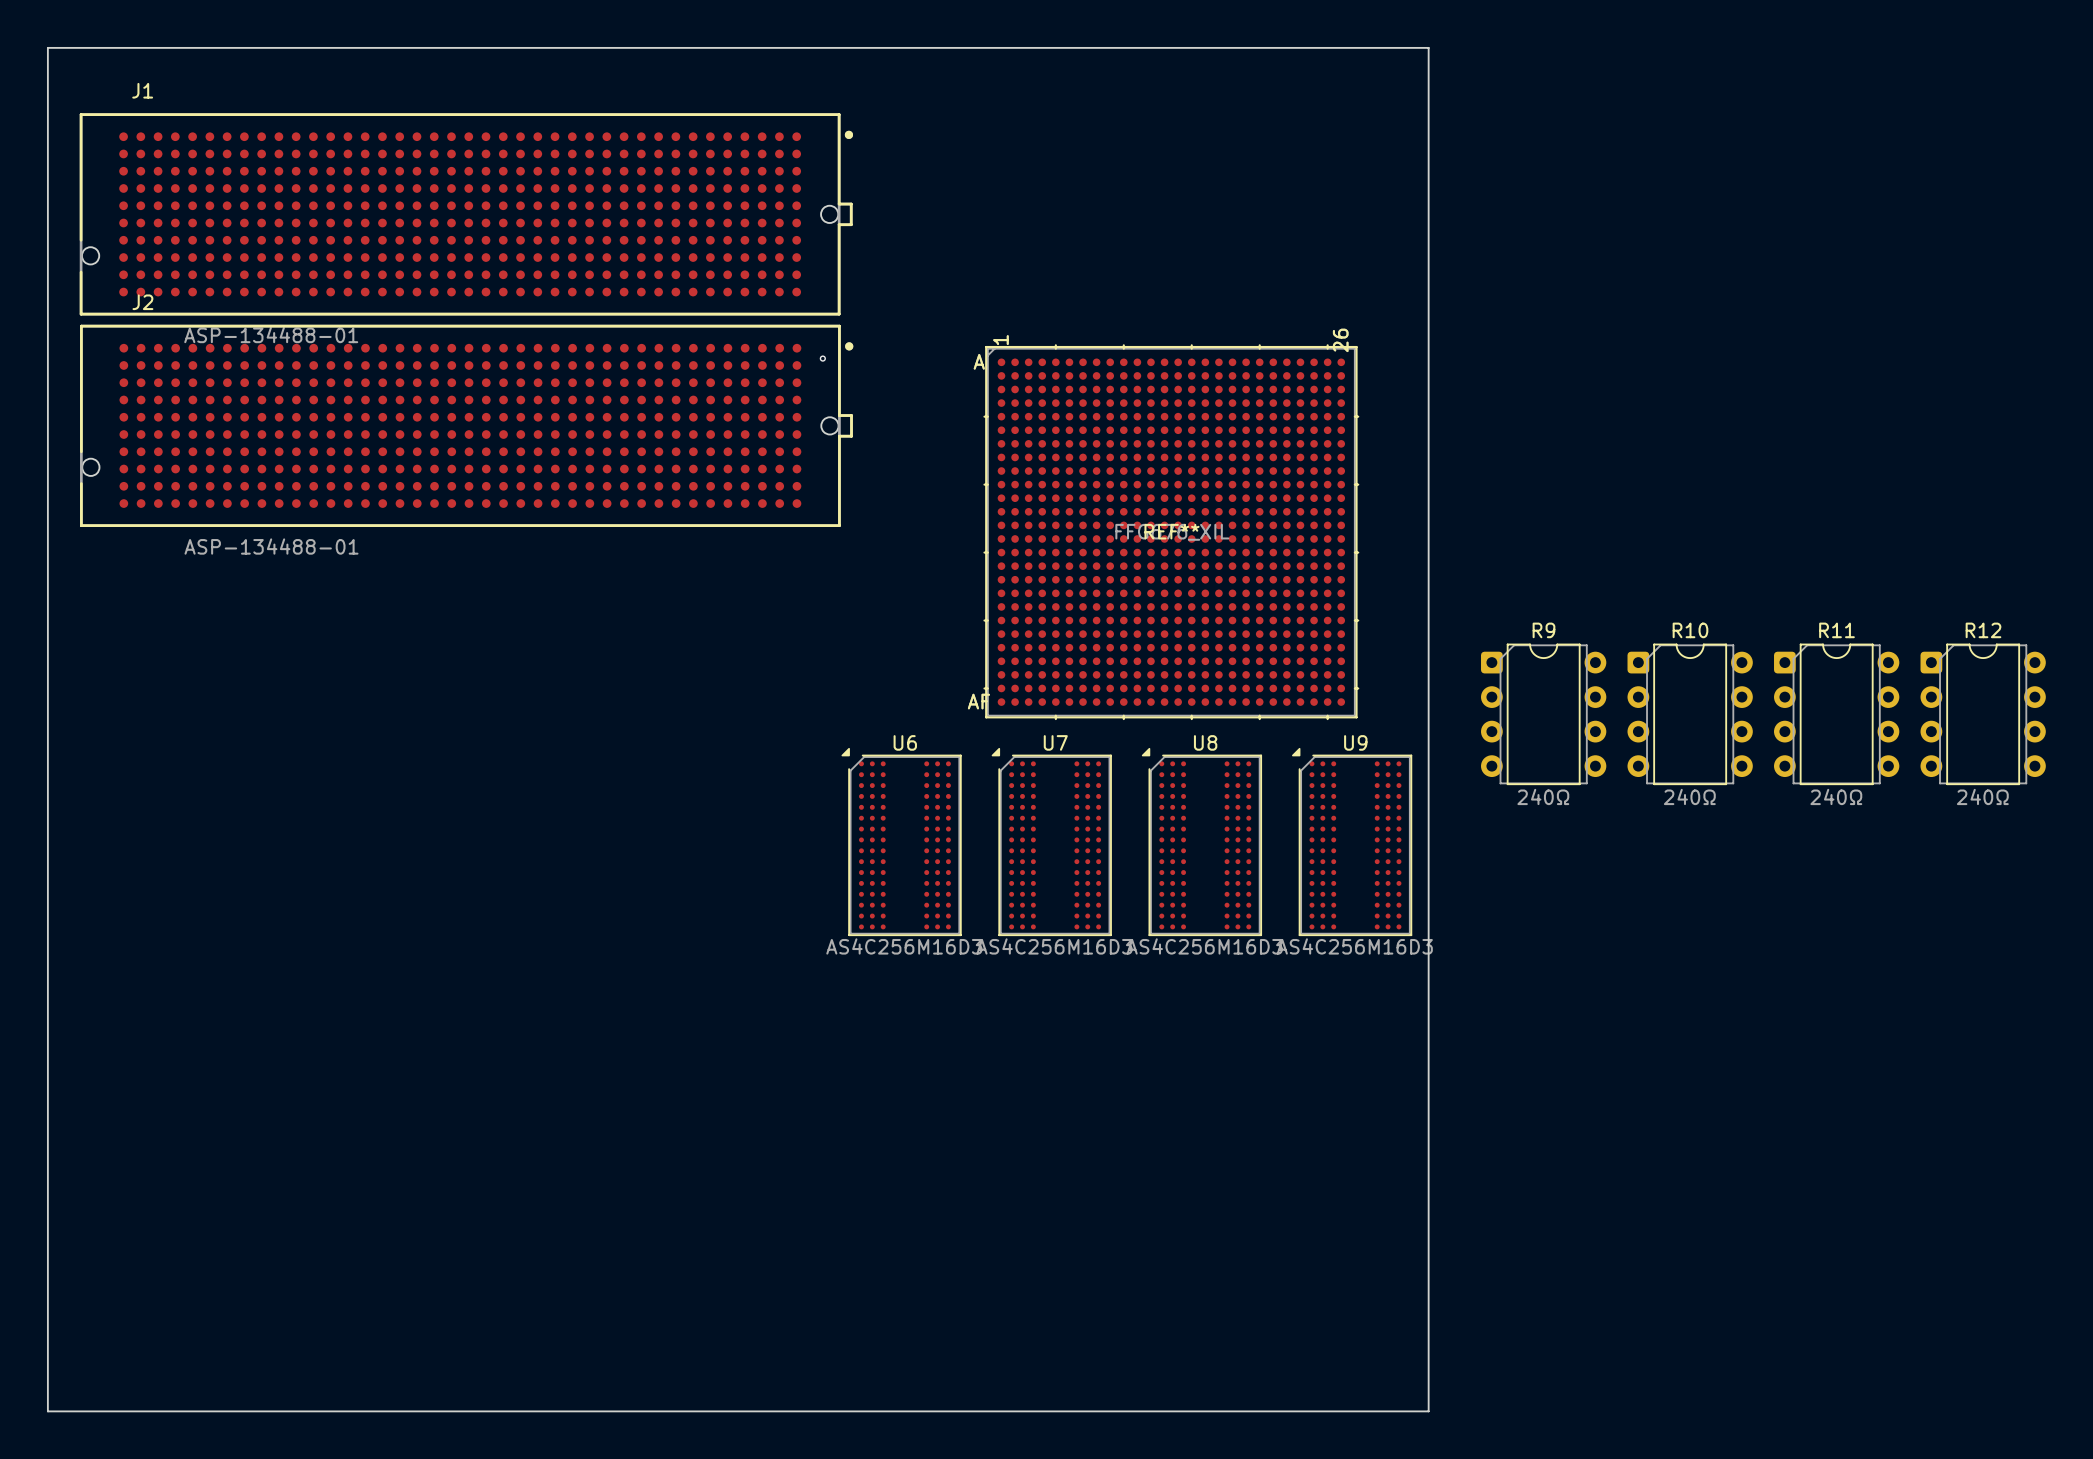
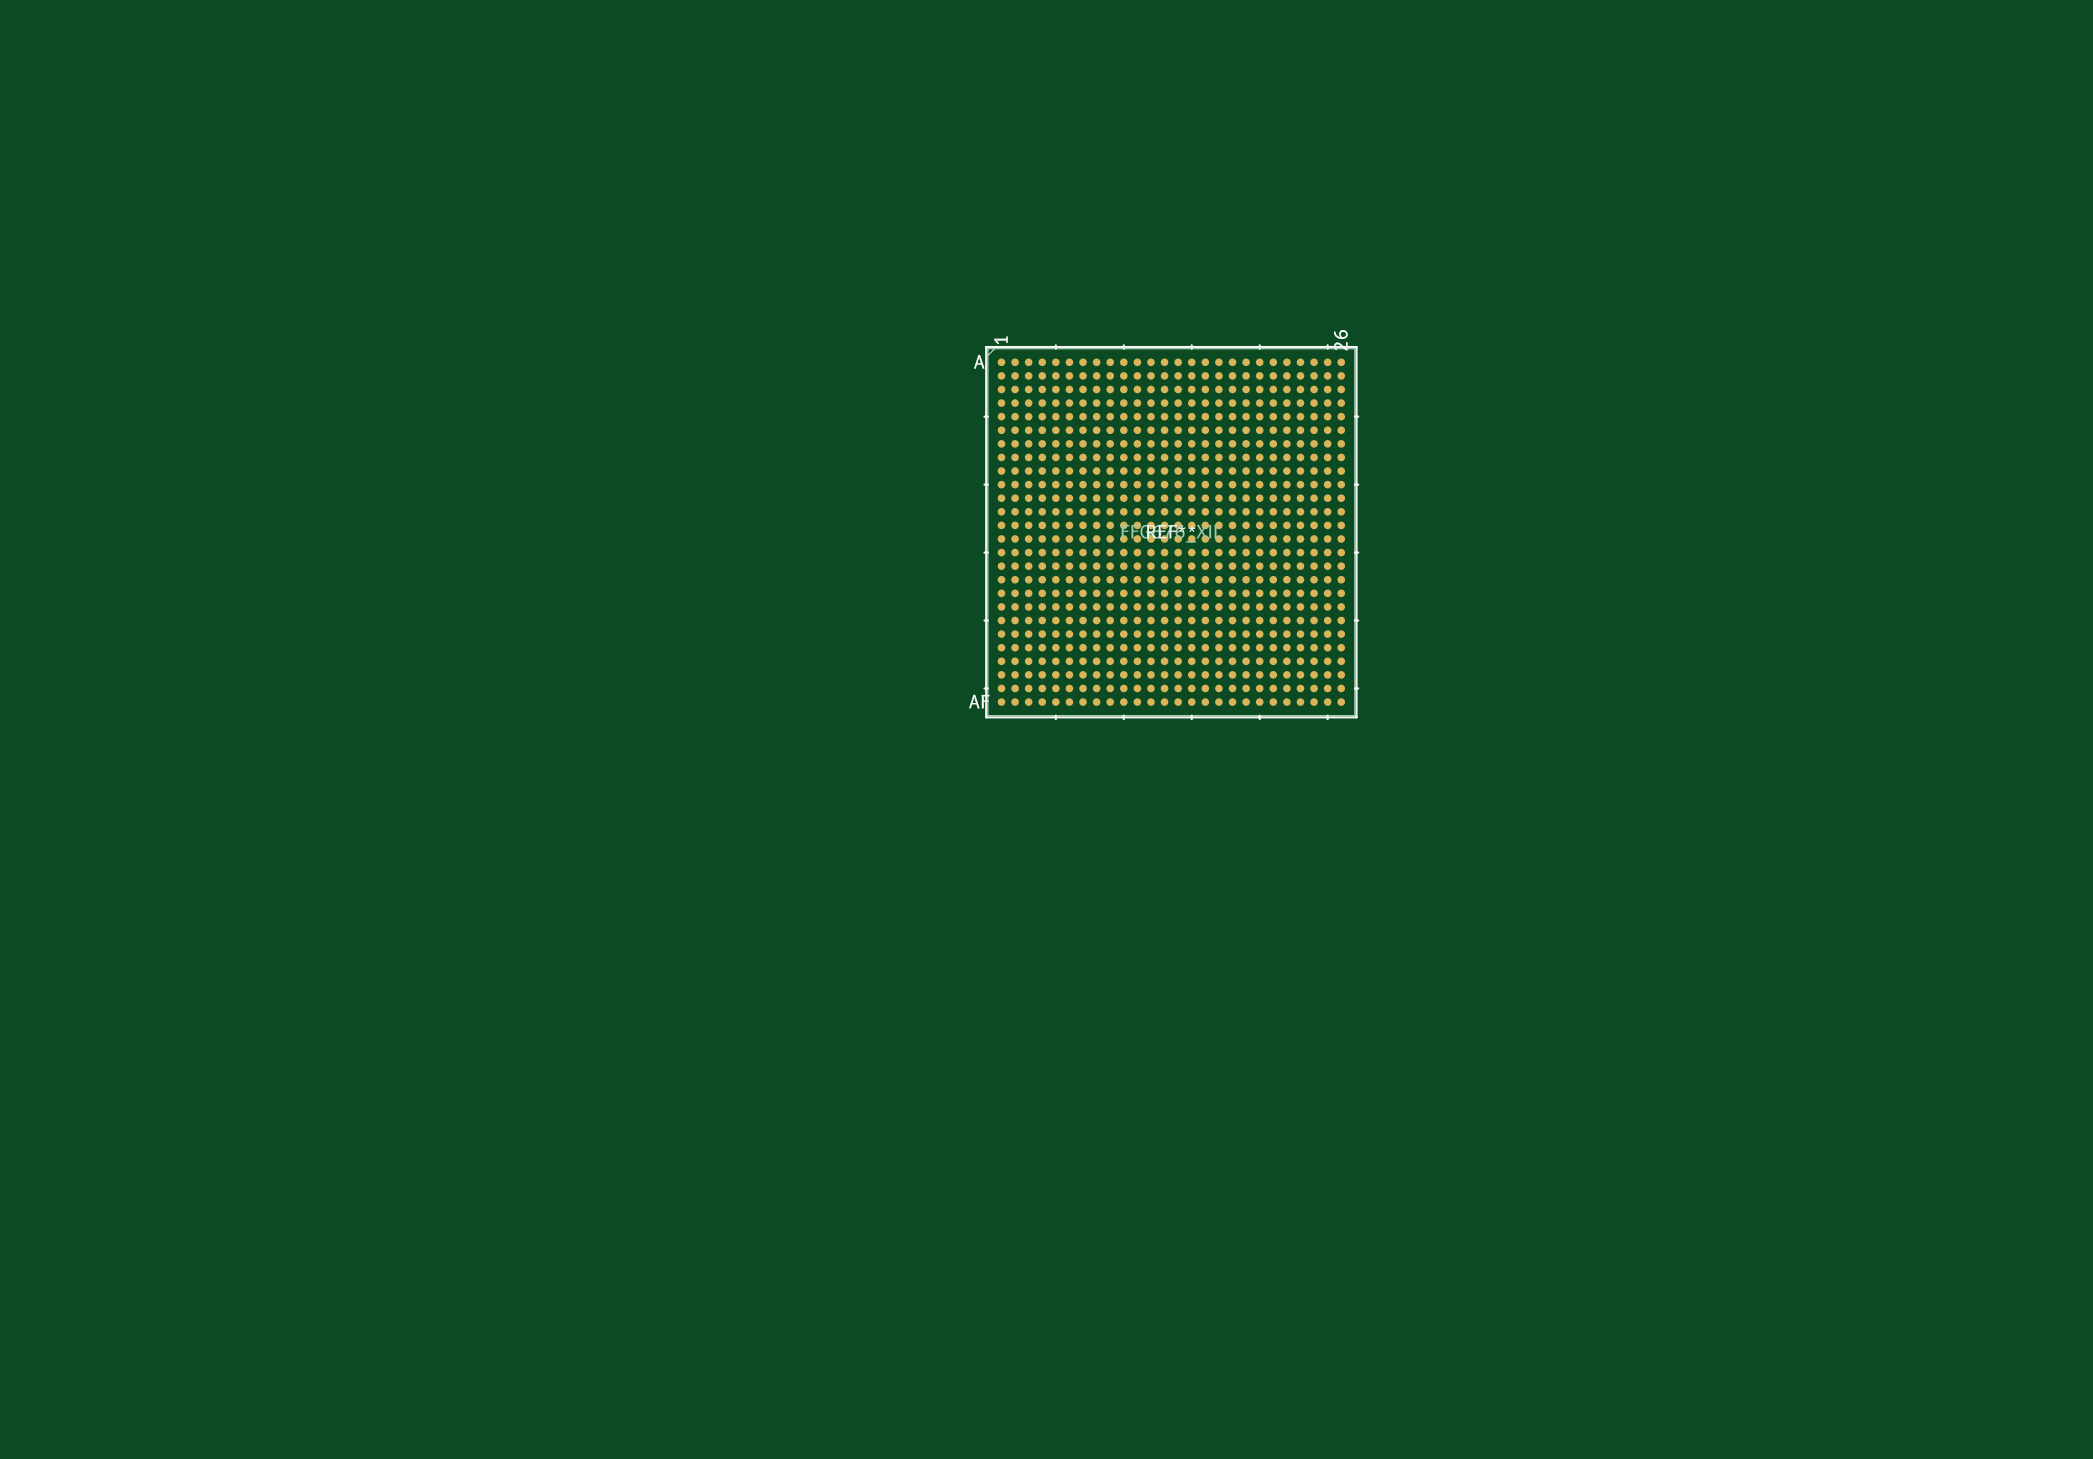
board edge: (47, 47) (1428, 47) (1428, 1411) (47, 1411) (47, 47) -> none
J1: ASP-134488-01 (466, 214) -> none
via: (822, 358) -> none
J2: ASP-134488-01 (466, 425) -> none
R9: 240Ω (1543, 714) -> none
R10: 240Ω (1690, 714) -> none
R11: 240Ω (1836, 714) -> none
R12: 240Ω (1983, 714) -> none
U6: AS4C256M16D3 (901, 841) -> none
U7: AS4C256M16D3 (1051, 841) -> none
U8: AS4C256M16D3 (1201, 841) -> none
U9: AS4C256M16D3 (1352, 841) -> none

